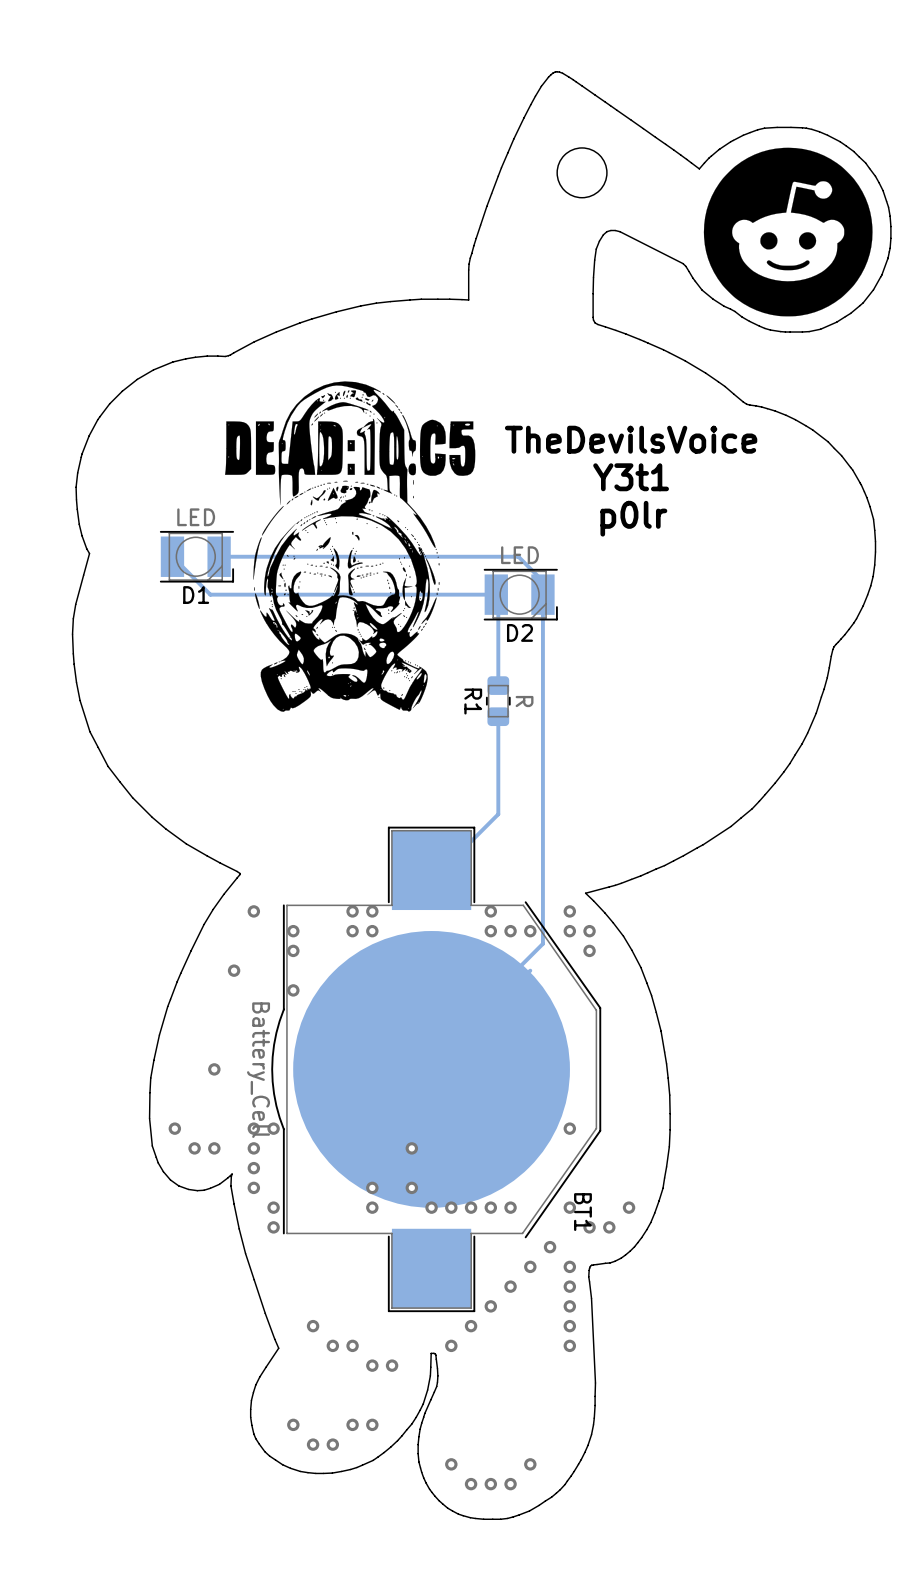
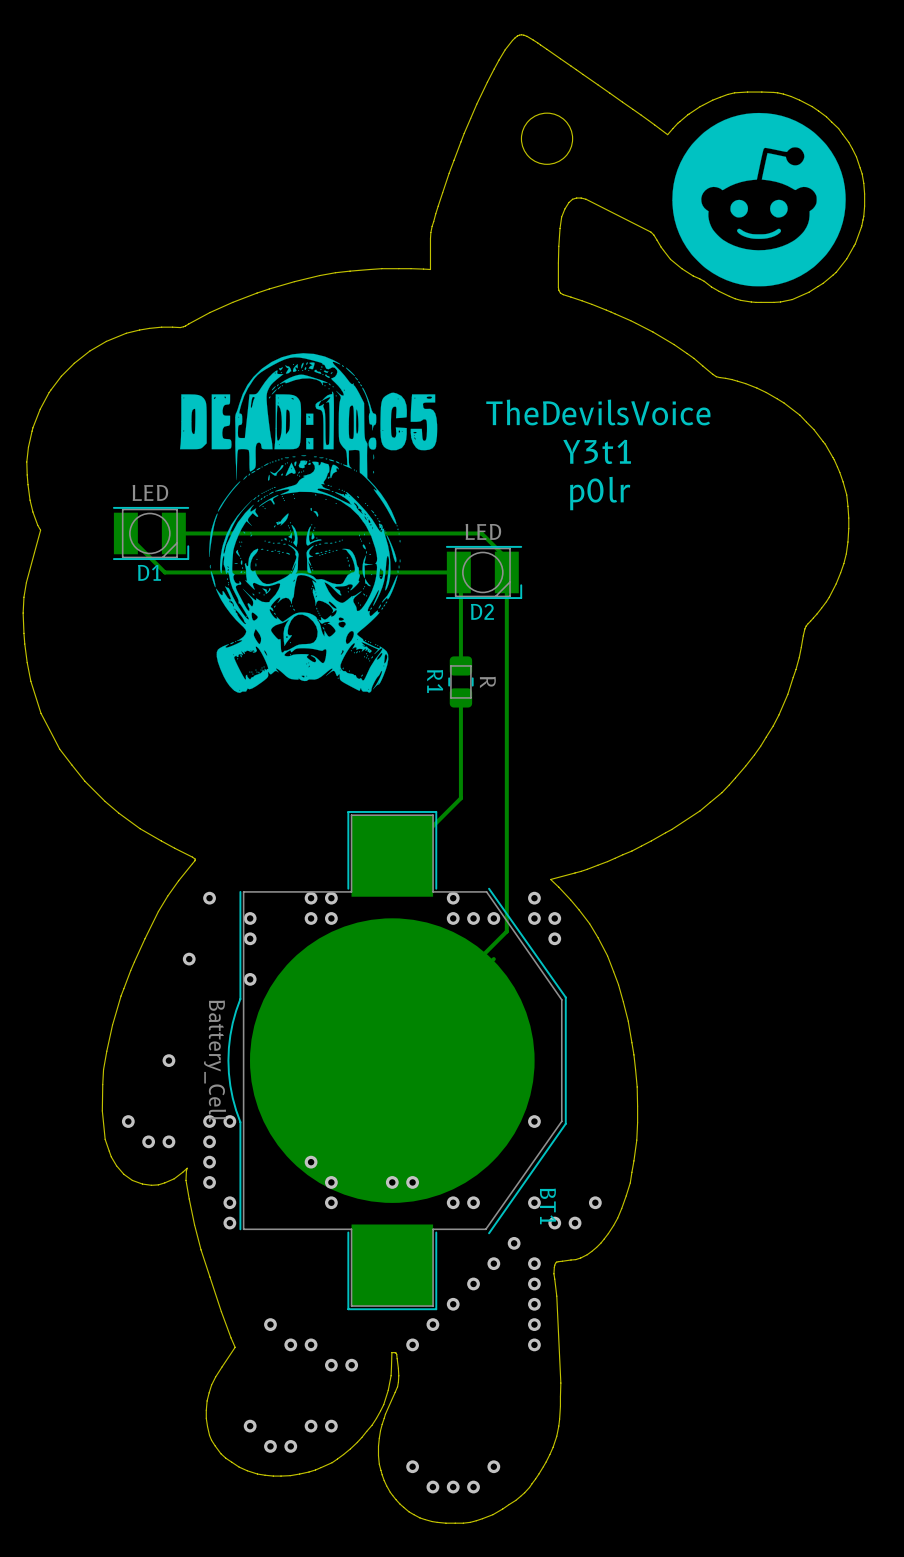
via: (411, 1148) -> none
via: none -> (311, 1162)
via: (411, 1187) -> none
via: none -> (392, 1182)
via: none -> (412, 1182)
via: (431, 1207) -> none
via: (451, 1207) -> none
via: (471, 1207) -> none

